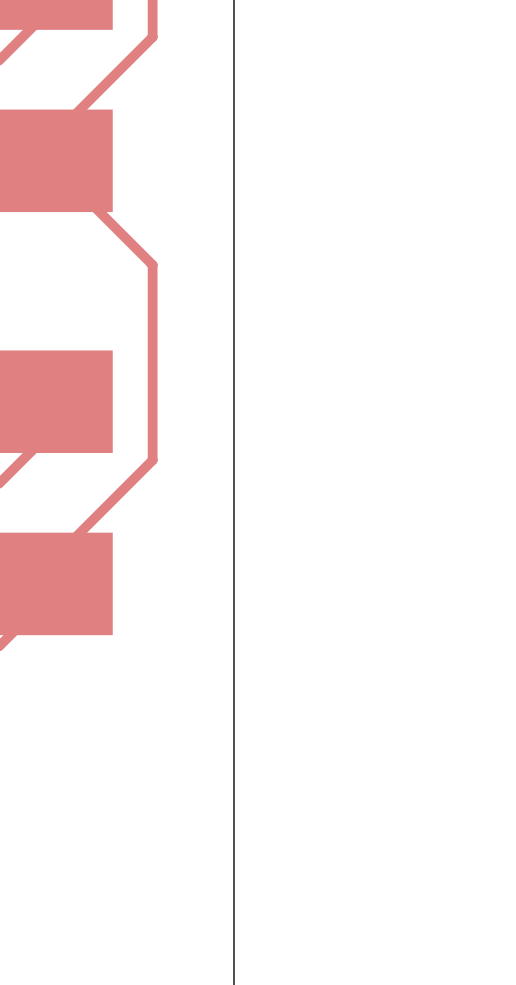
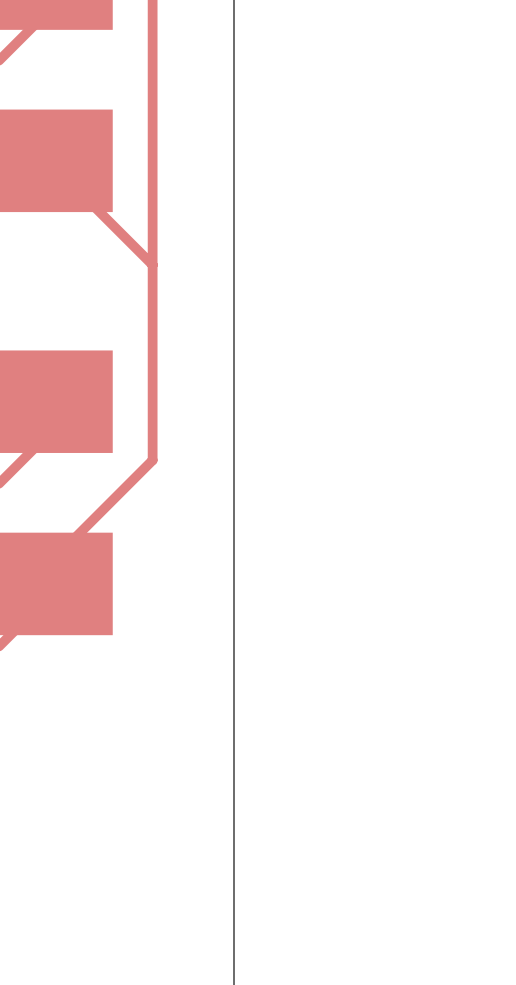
top track: (152, 37) (54, 134) (54, 160) -> (152, 37) (152, 264)

